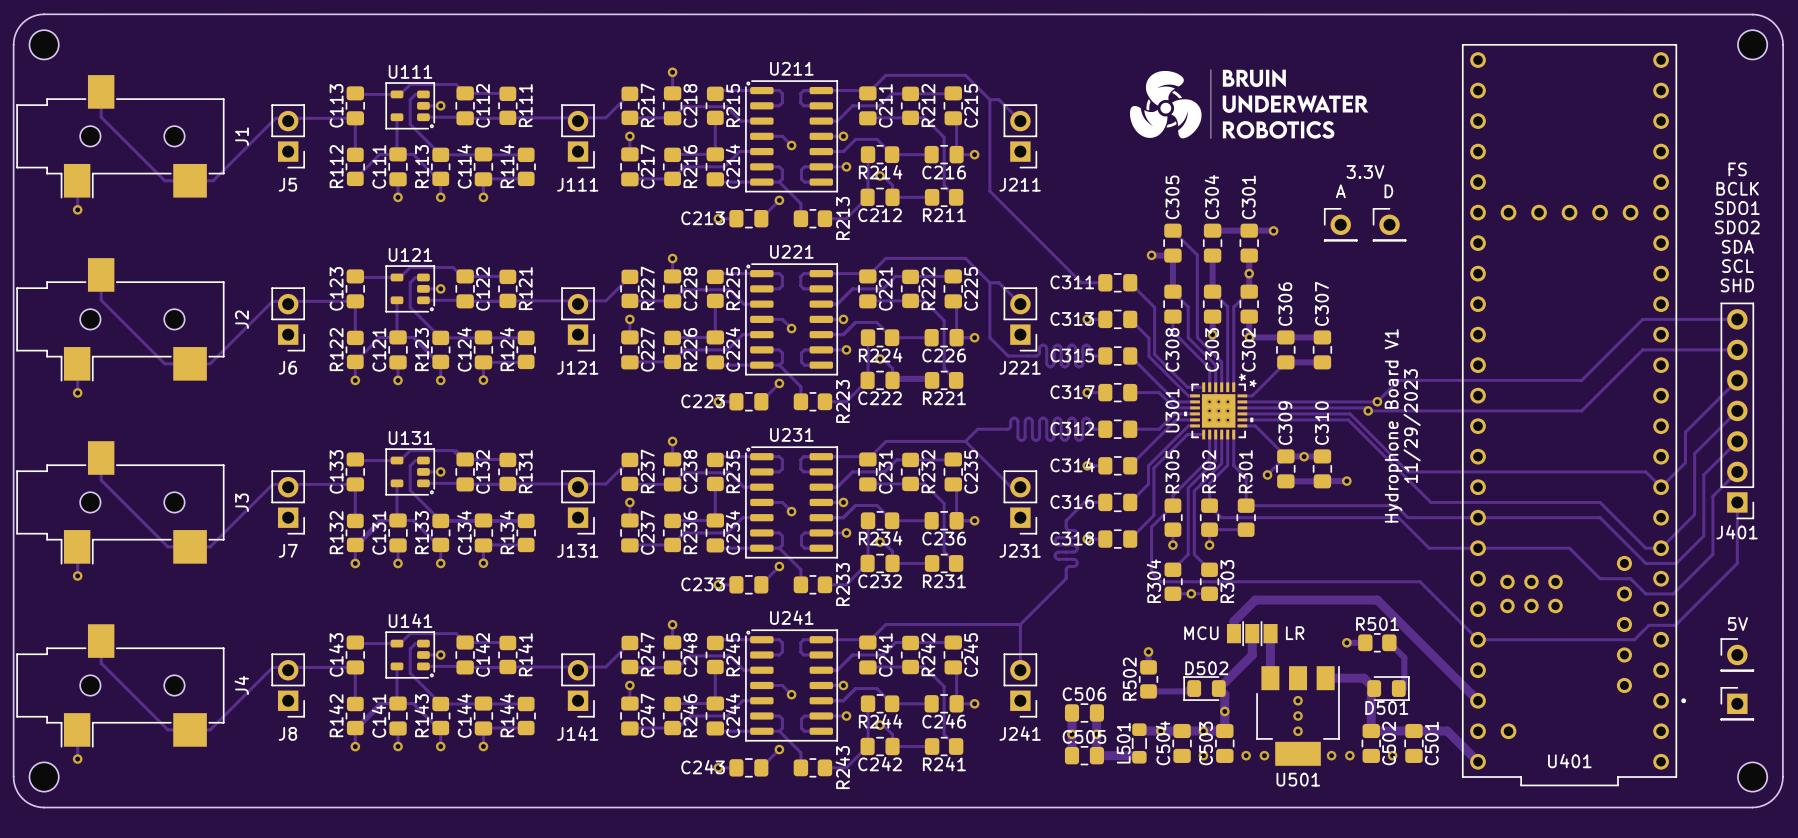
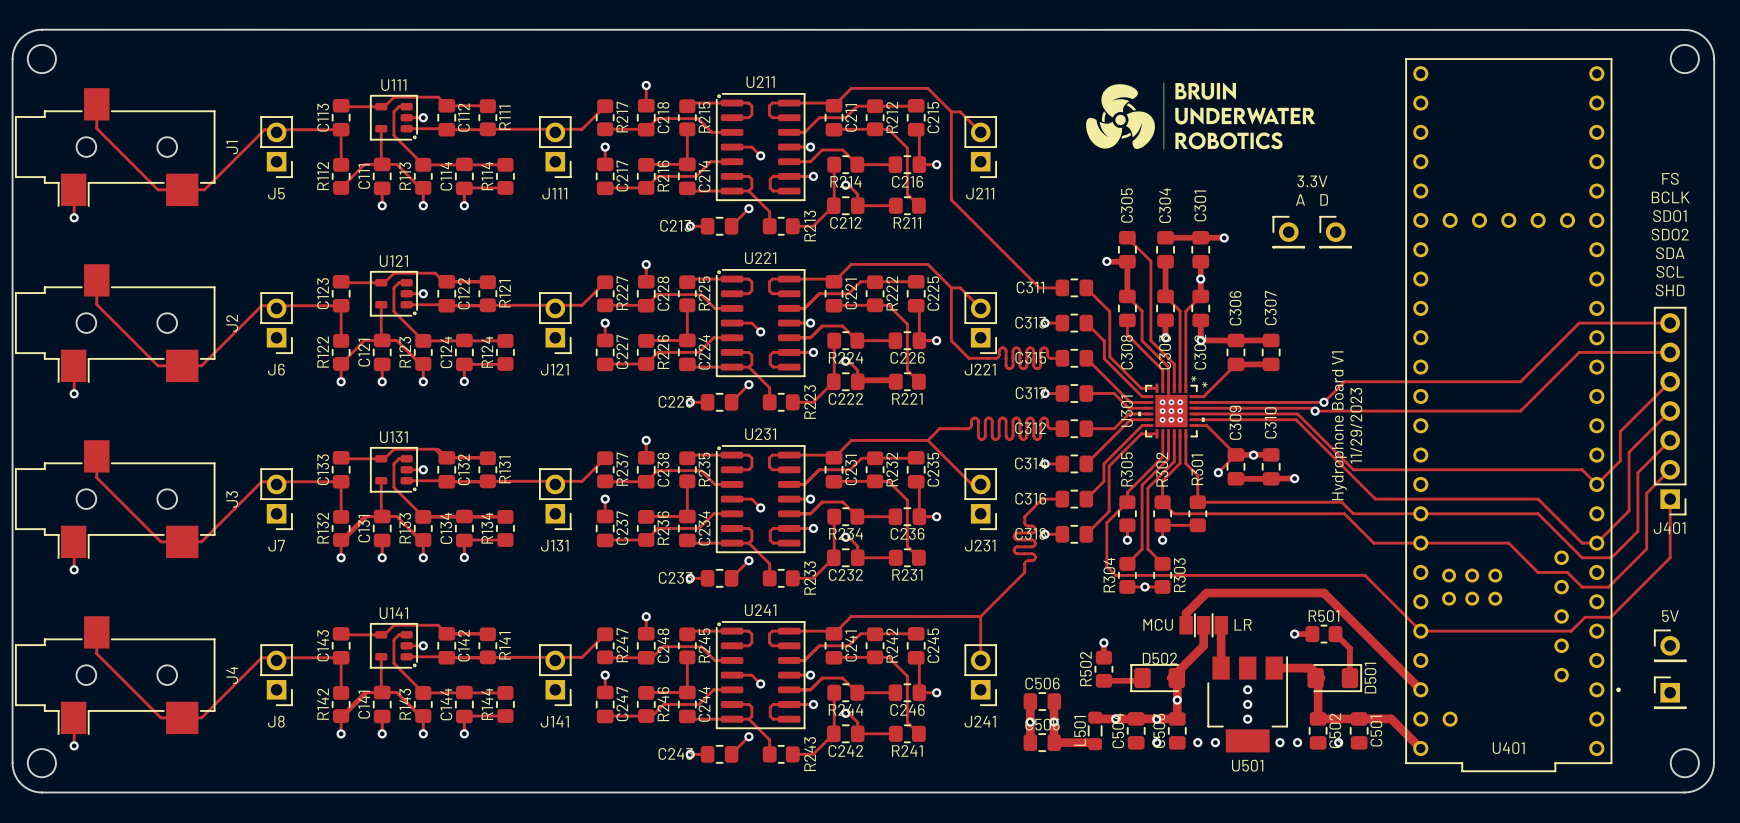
D502 footprint: [1183, 676, 1226, 701] -> [1130, 664, 1186, 692]
D501 footprint: [1367, 676, 1410, 701] -> [1307, 664, 1362, 692]
D501 name rotation: 0° (1386, 707) -> 90° counterclockwise (1370, 678)

